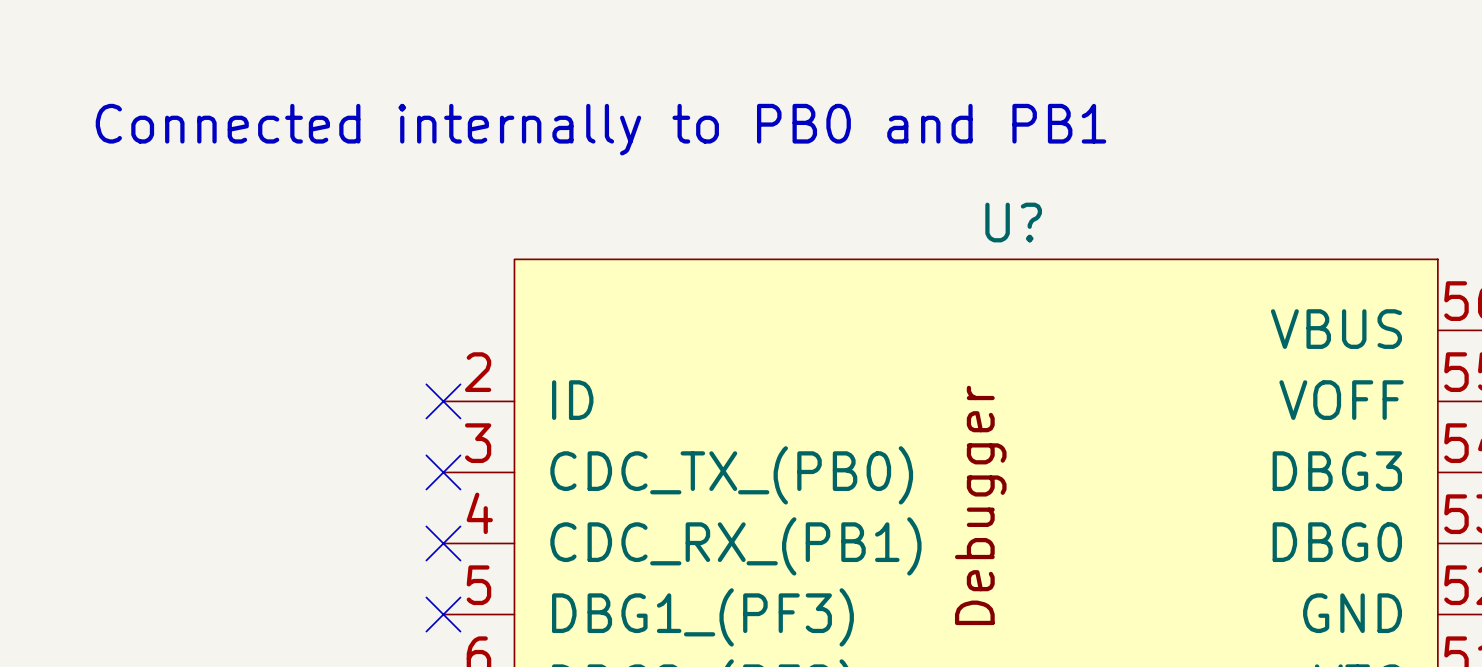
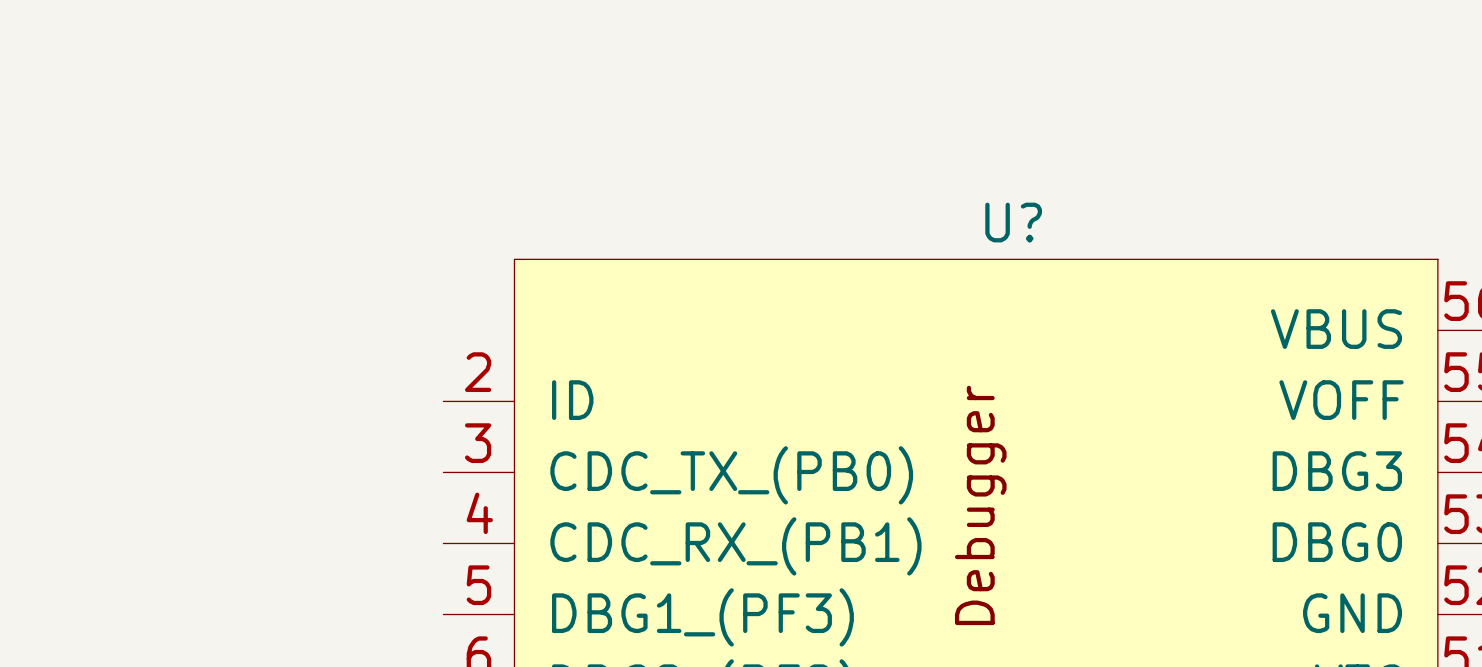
text: Connected internally to PB0 and PB1 (600, 129) -> none
no-connect mark: (443, 401) -> none
no-connect mark: (443, 472) -> none
no-connect mark: (443, 543) -> none
no-connect mark: (443, 614) -> none

